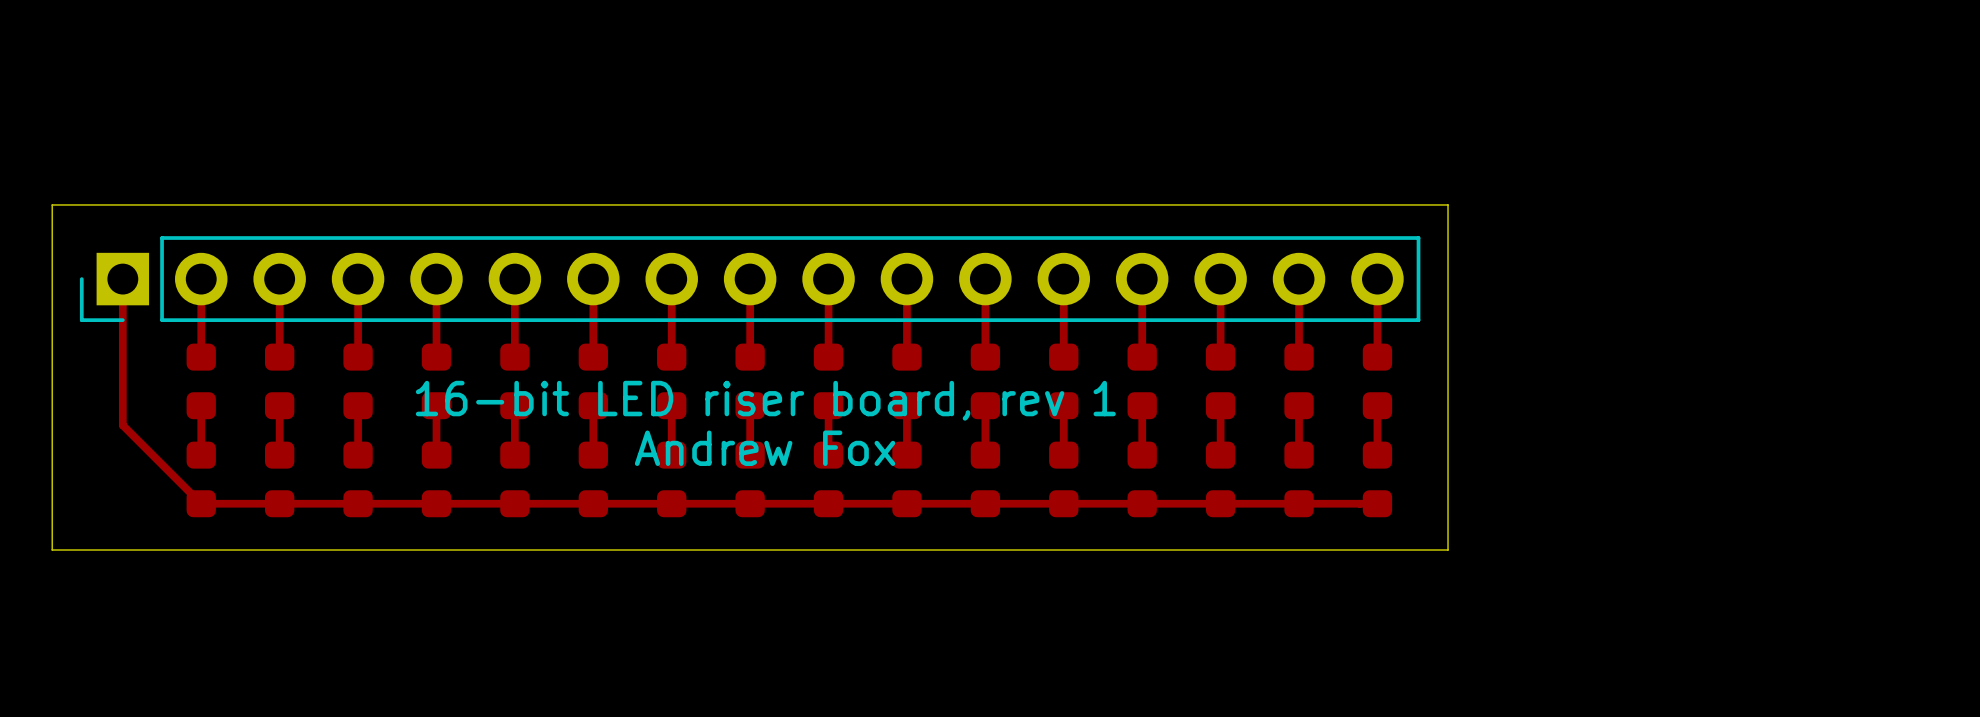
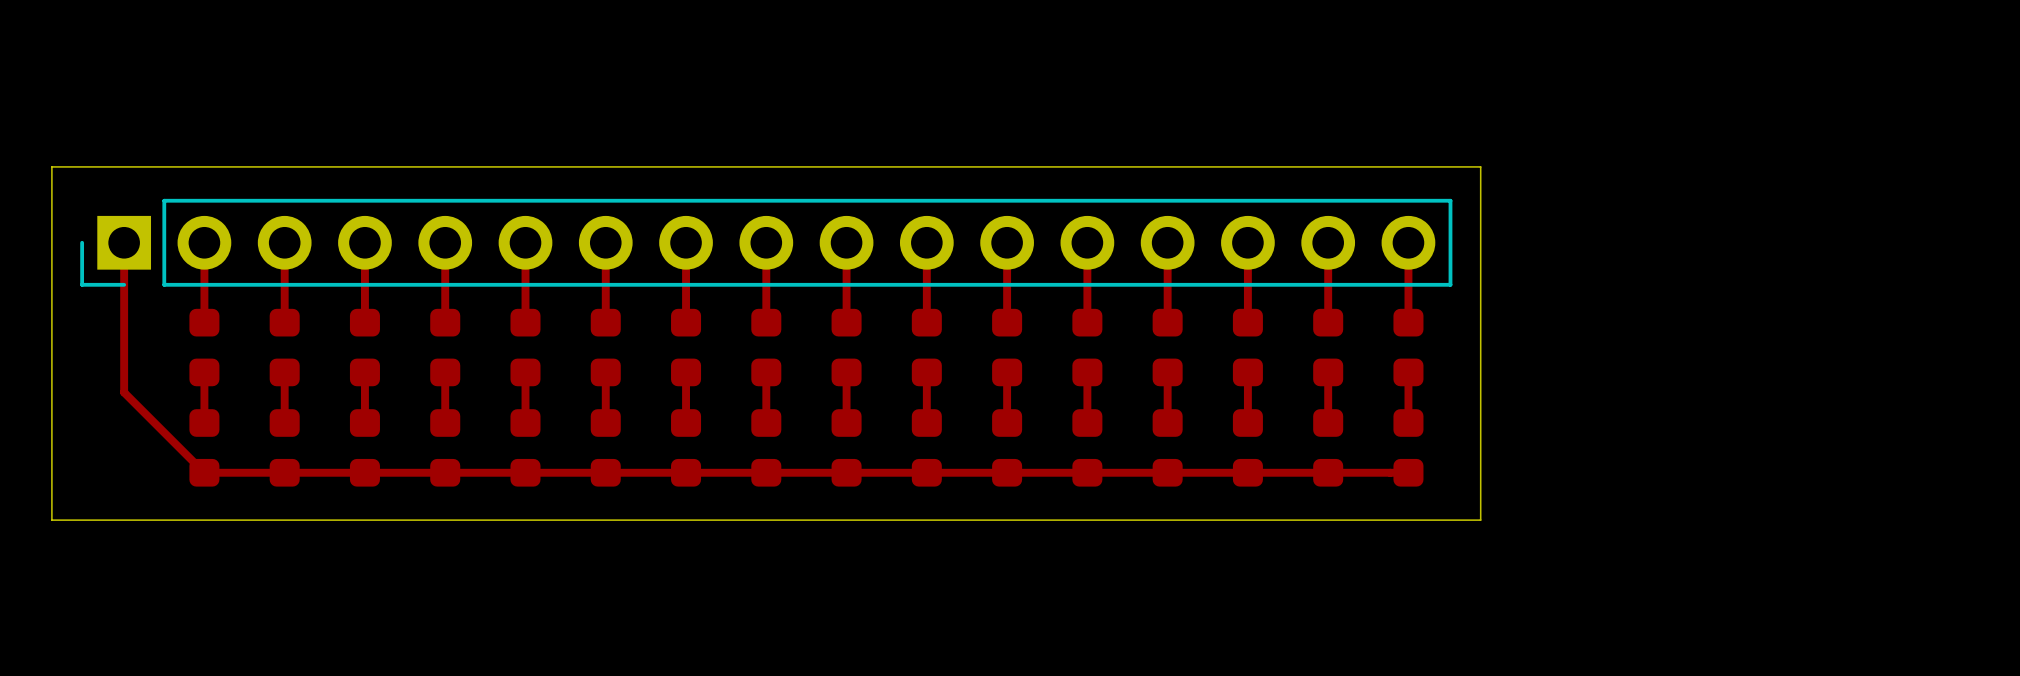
text: 16-bit LED riser board, rev 1 (765, 400) -> none
text: Andrew Fox (765, 448) -> none

